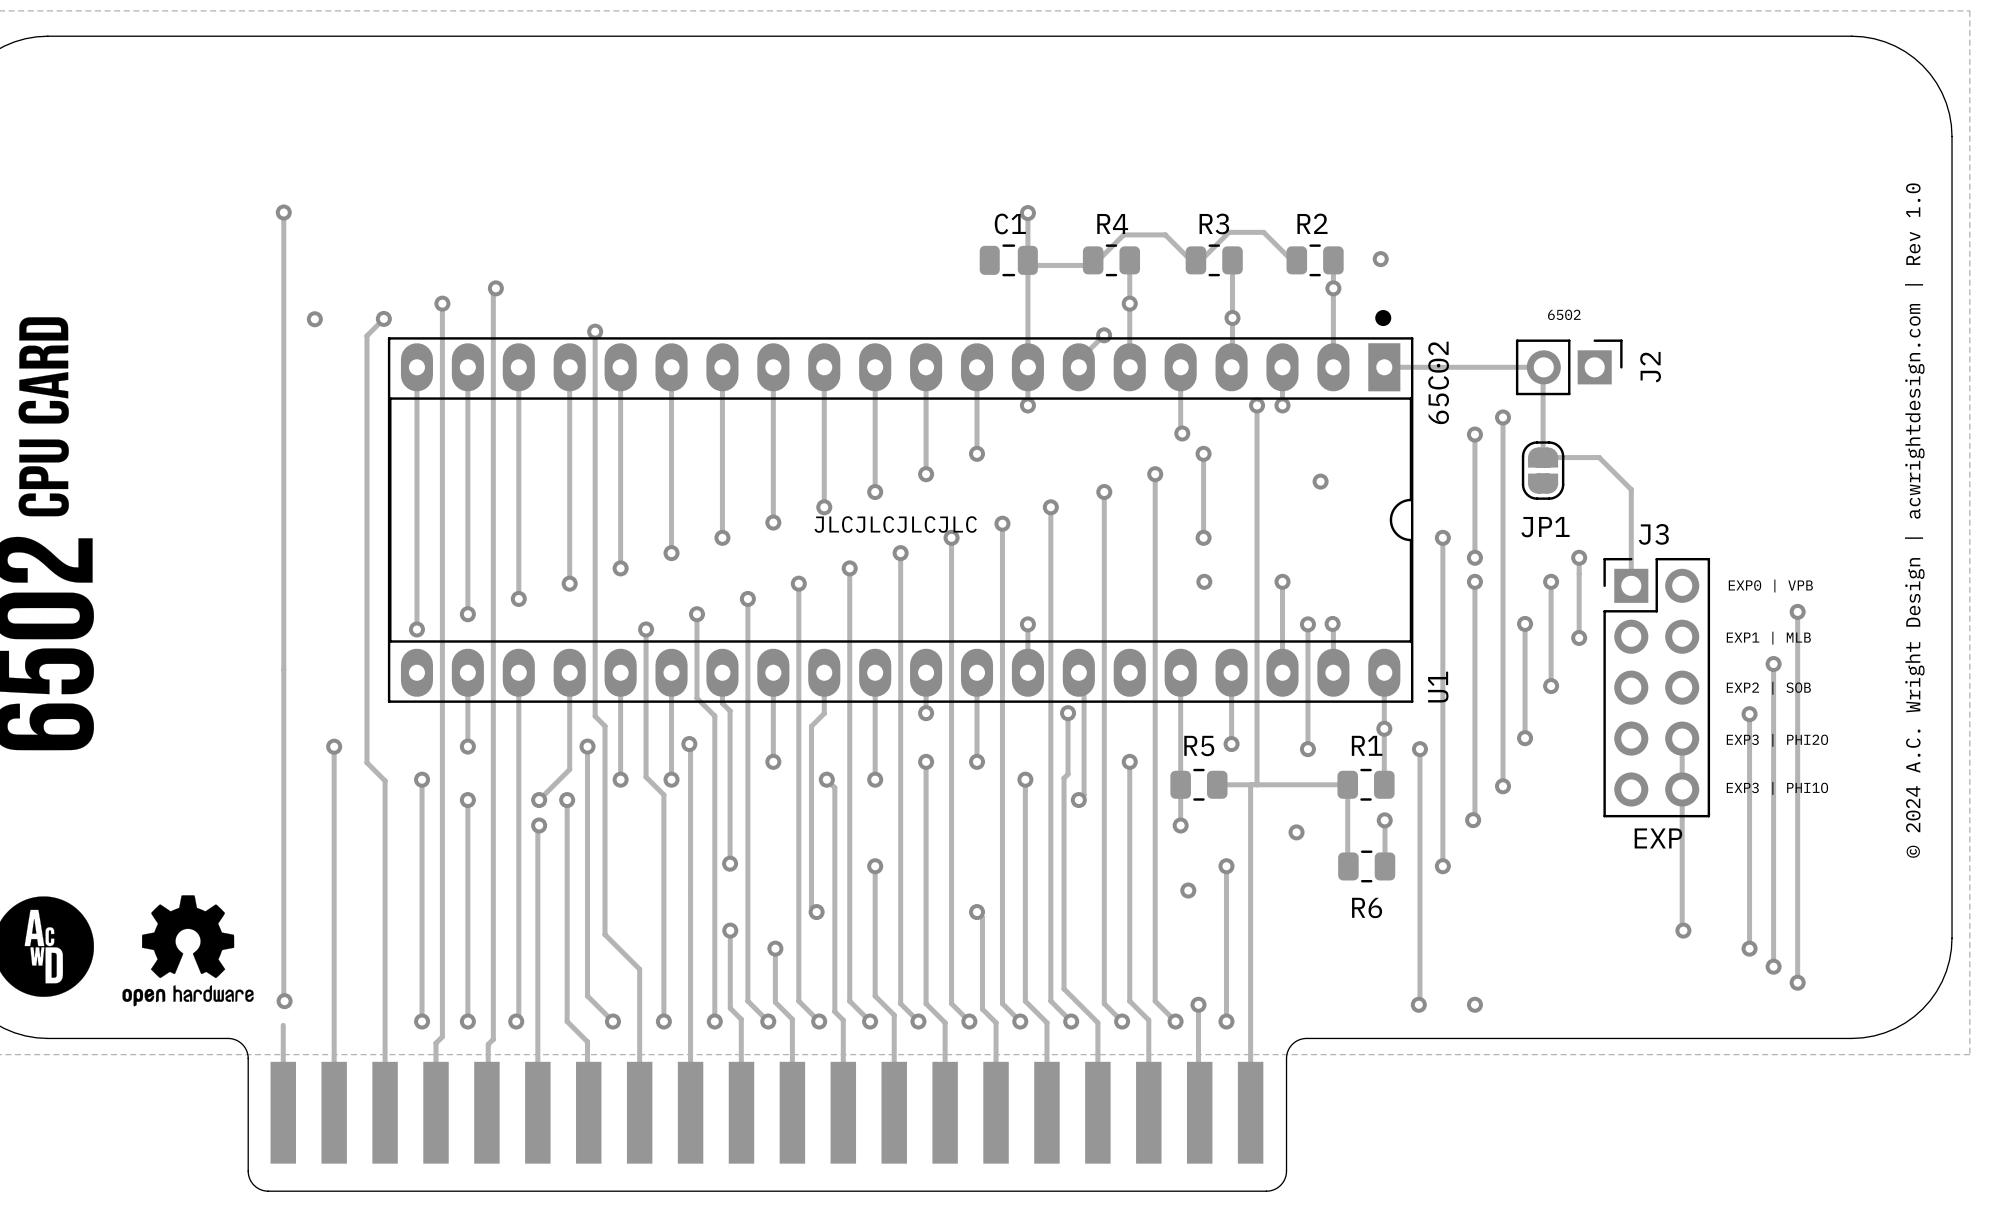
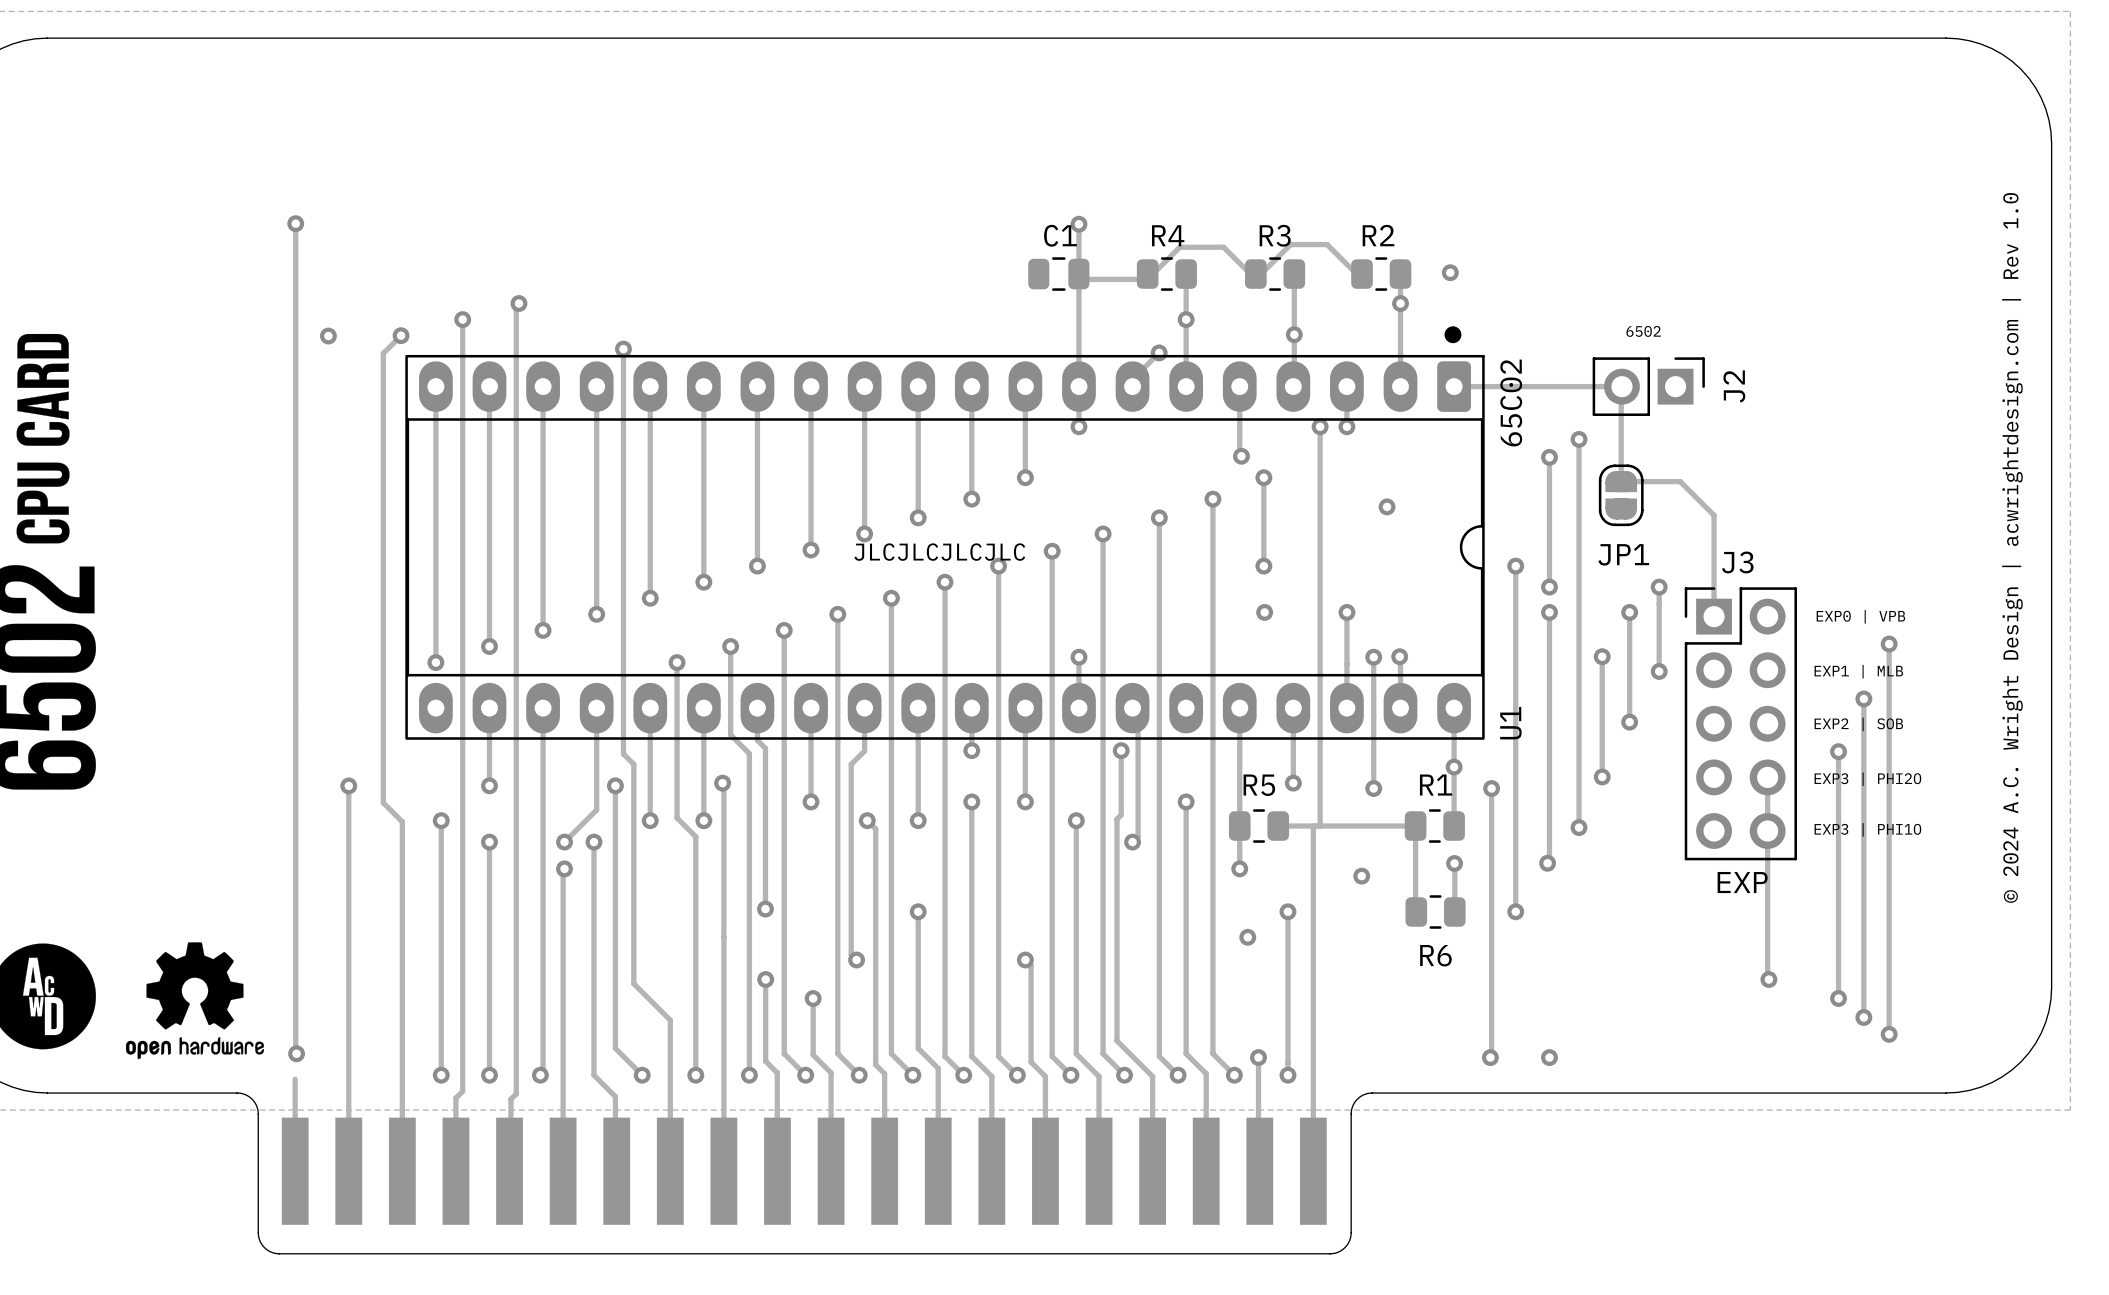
U1 footprint: [387, 337, 1414, 703] -> [405, 354, 1485, 740]

